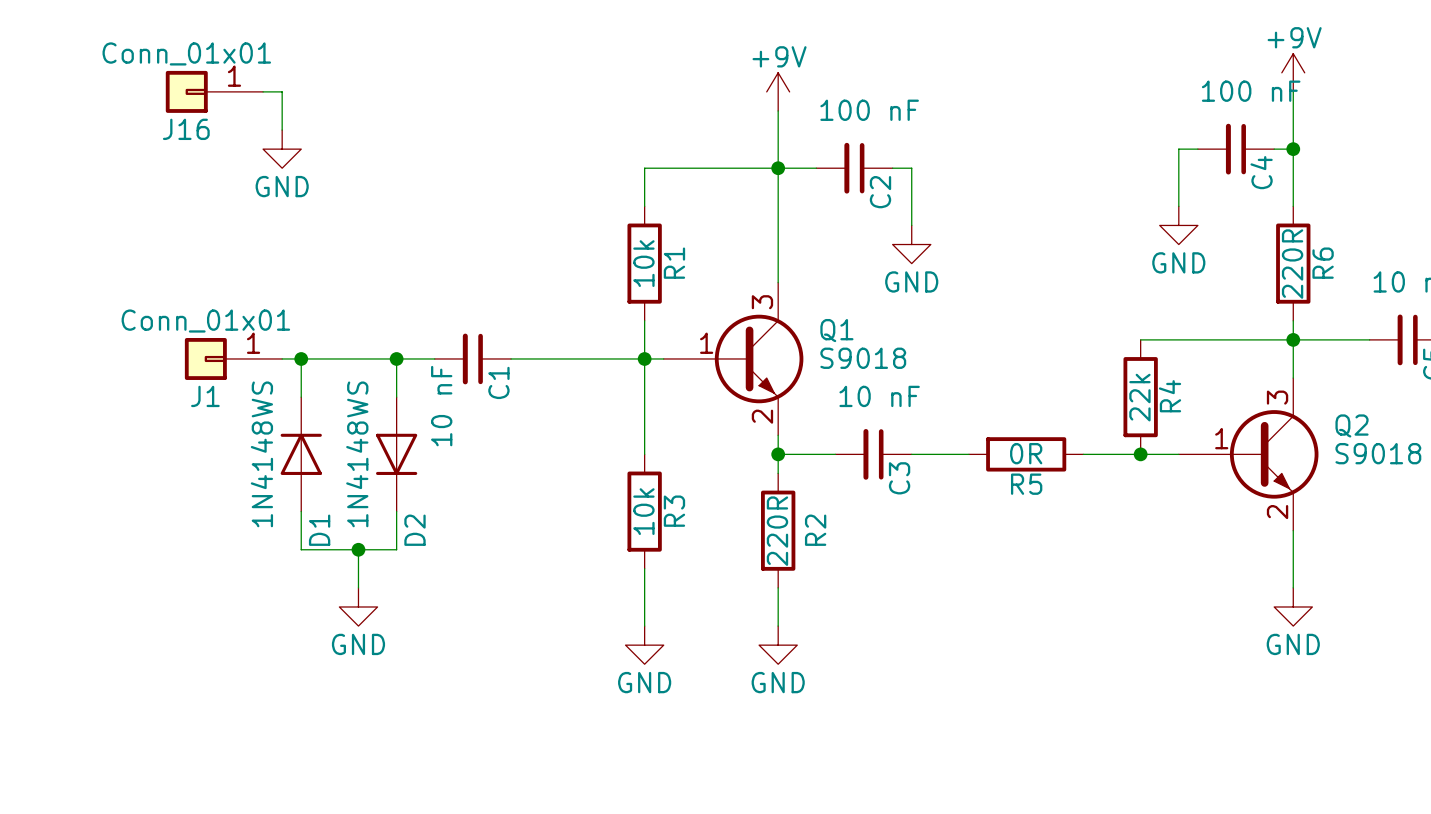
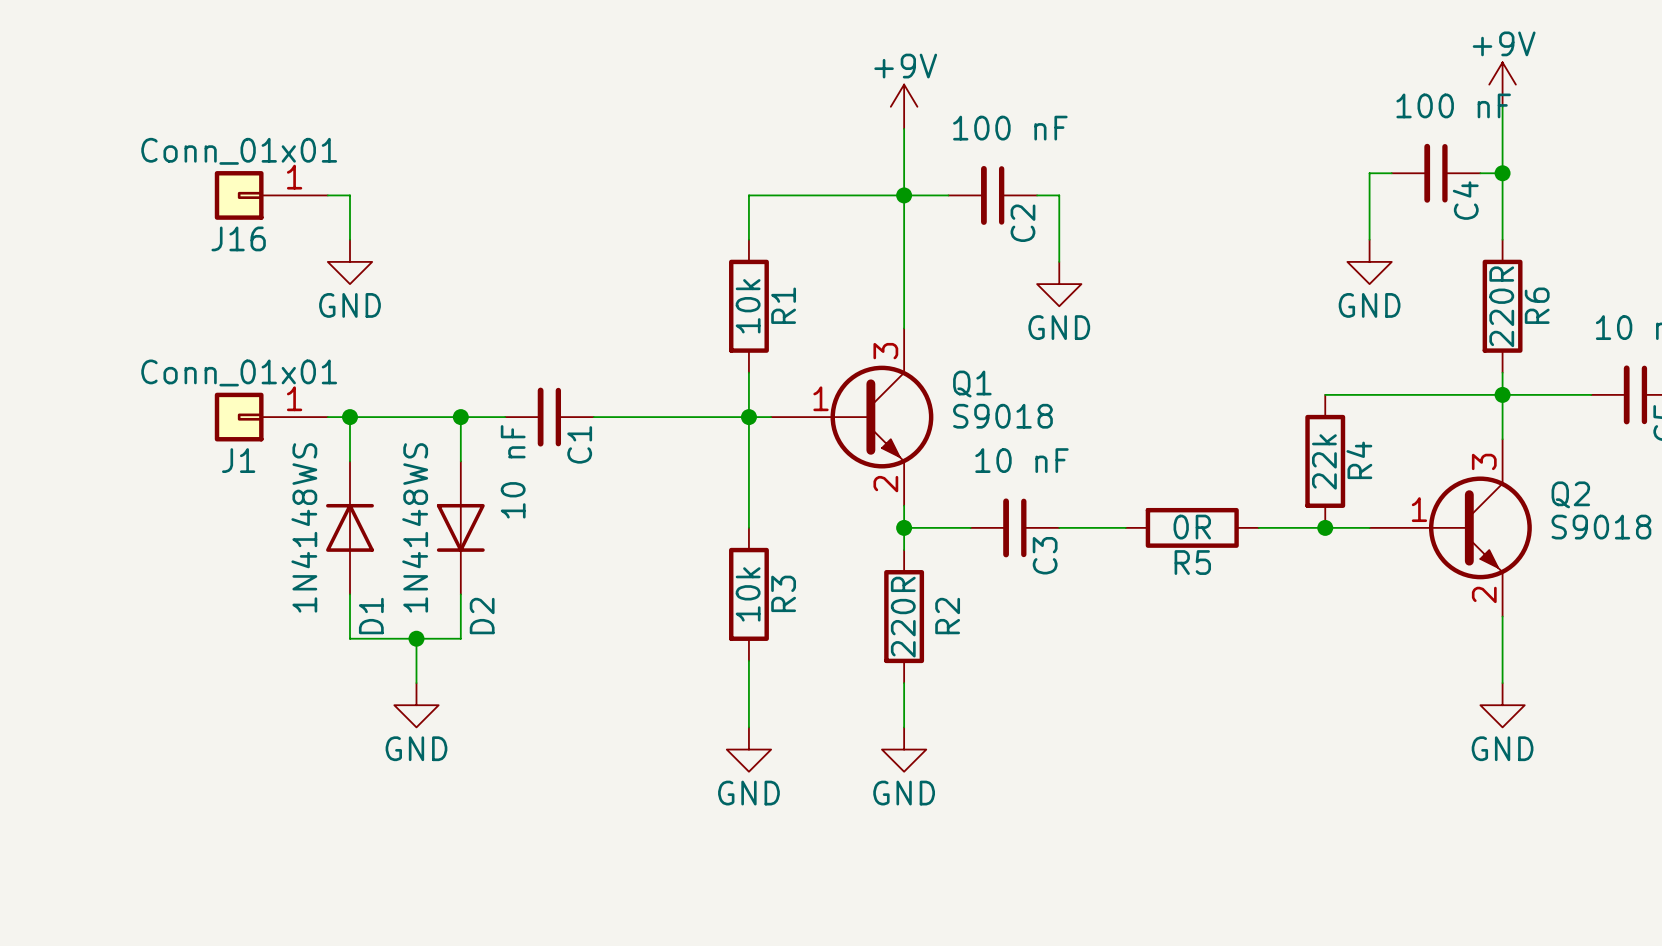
J16 position: (214, 91) -> (271, 195)
wire: (263, 91) (282, 91) (282, 130) -> (327, 195) (349, 195) (349, 239)
power symbol position: GND (282, 149) -> GND (349, 261)

